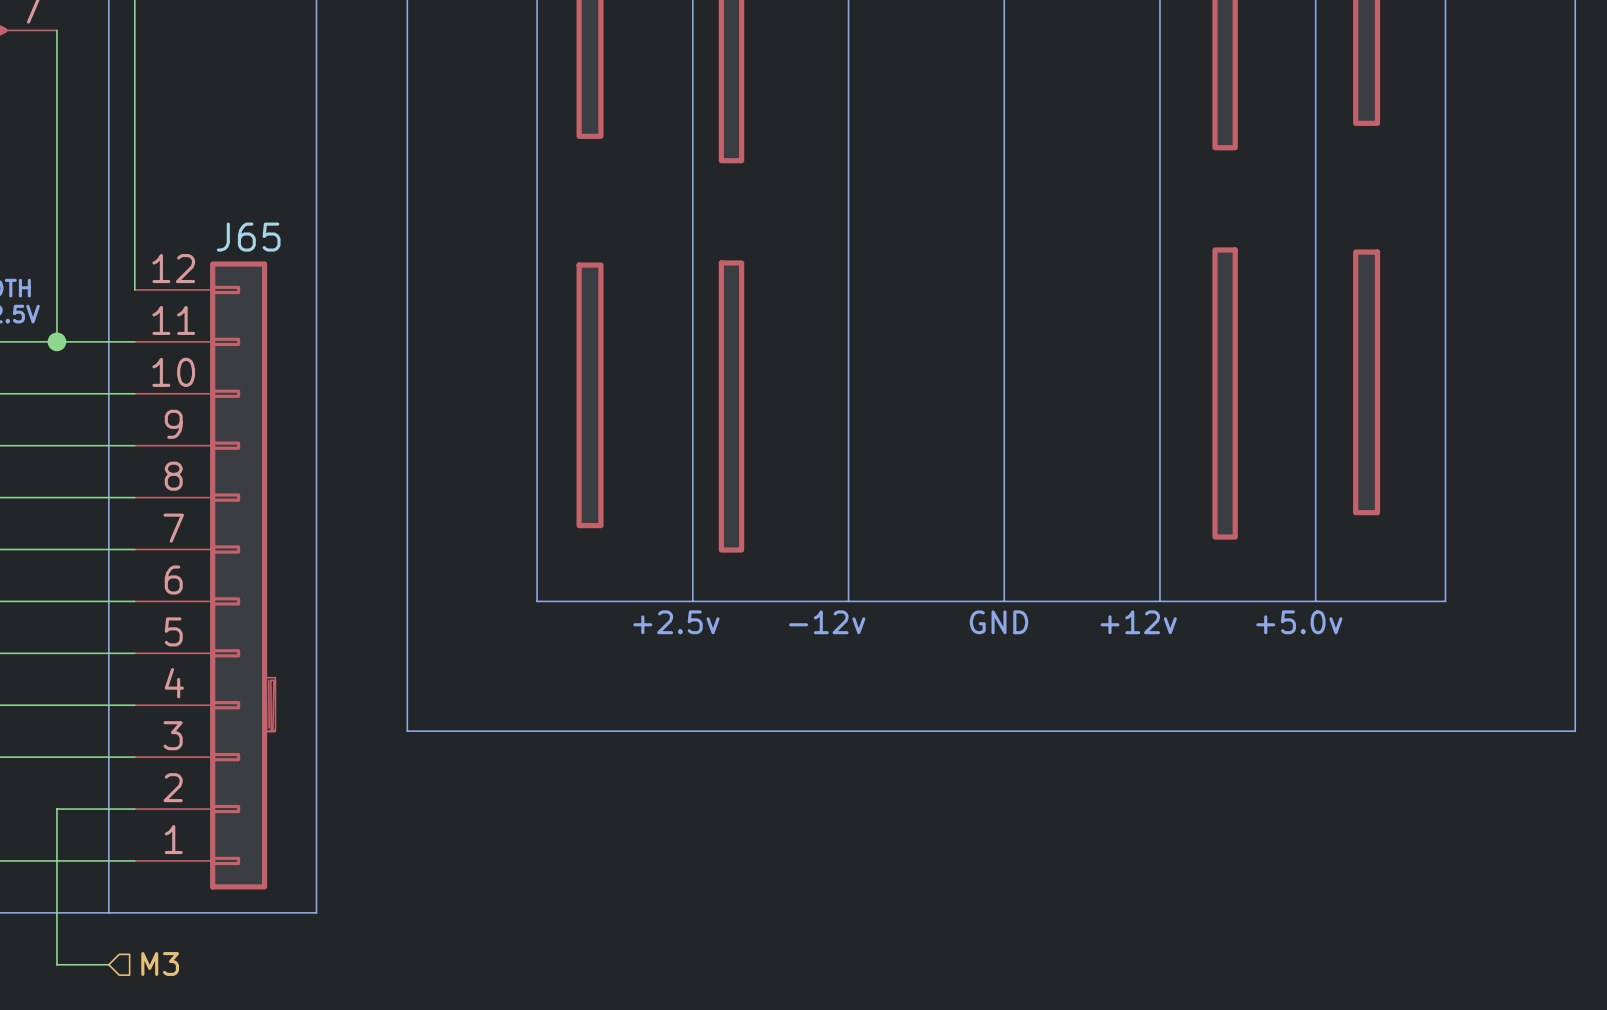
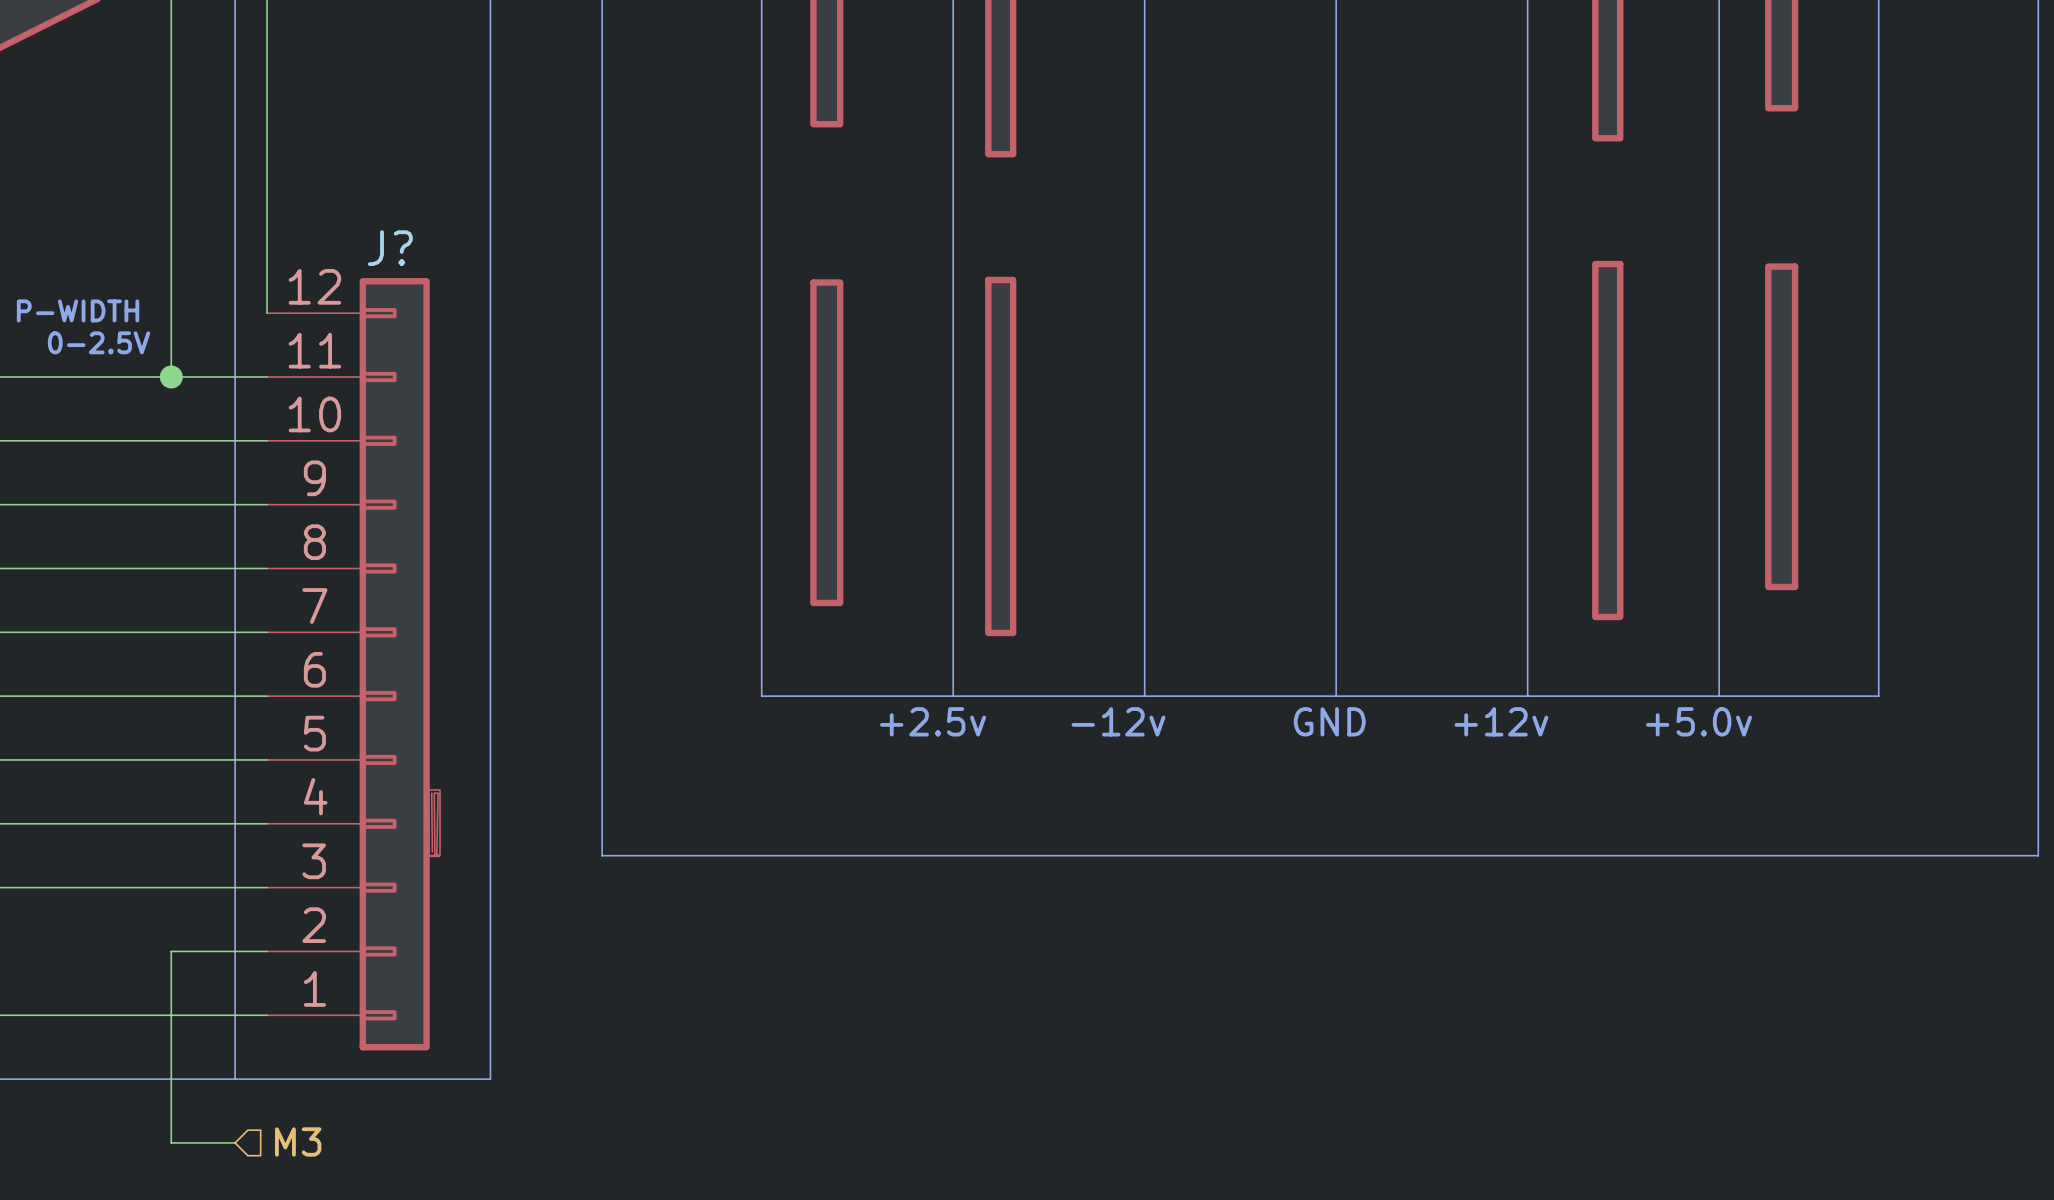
J65 name: J65 (248, 237) -> J? (390, 248)

